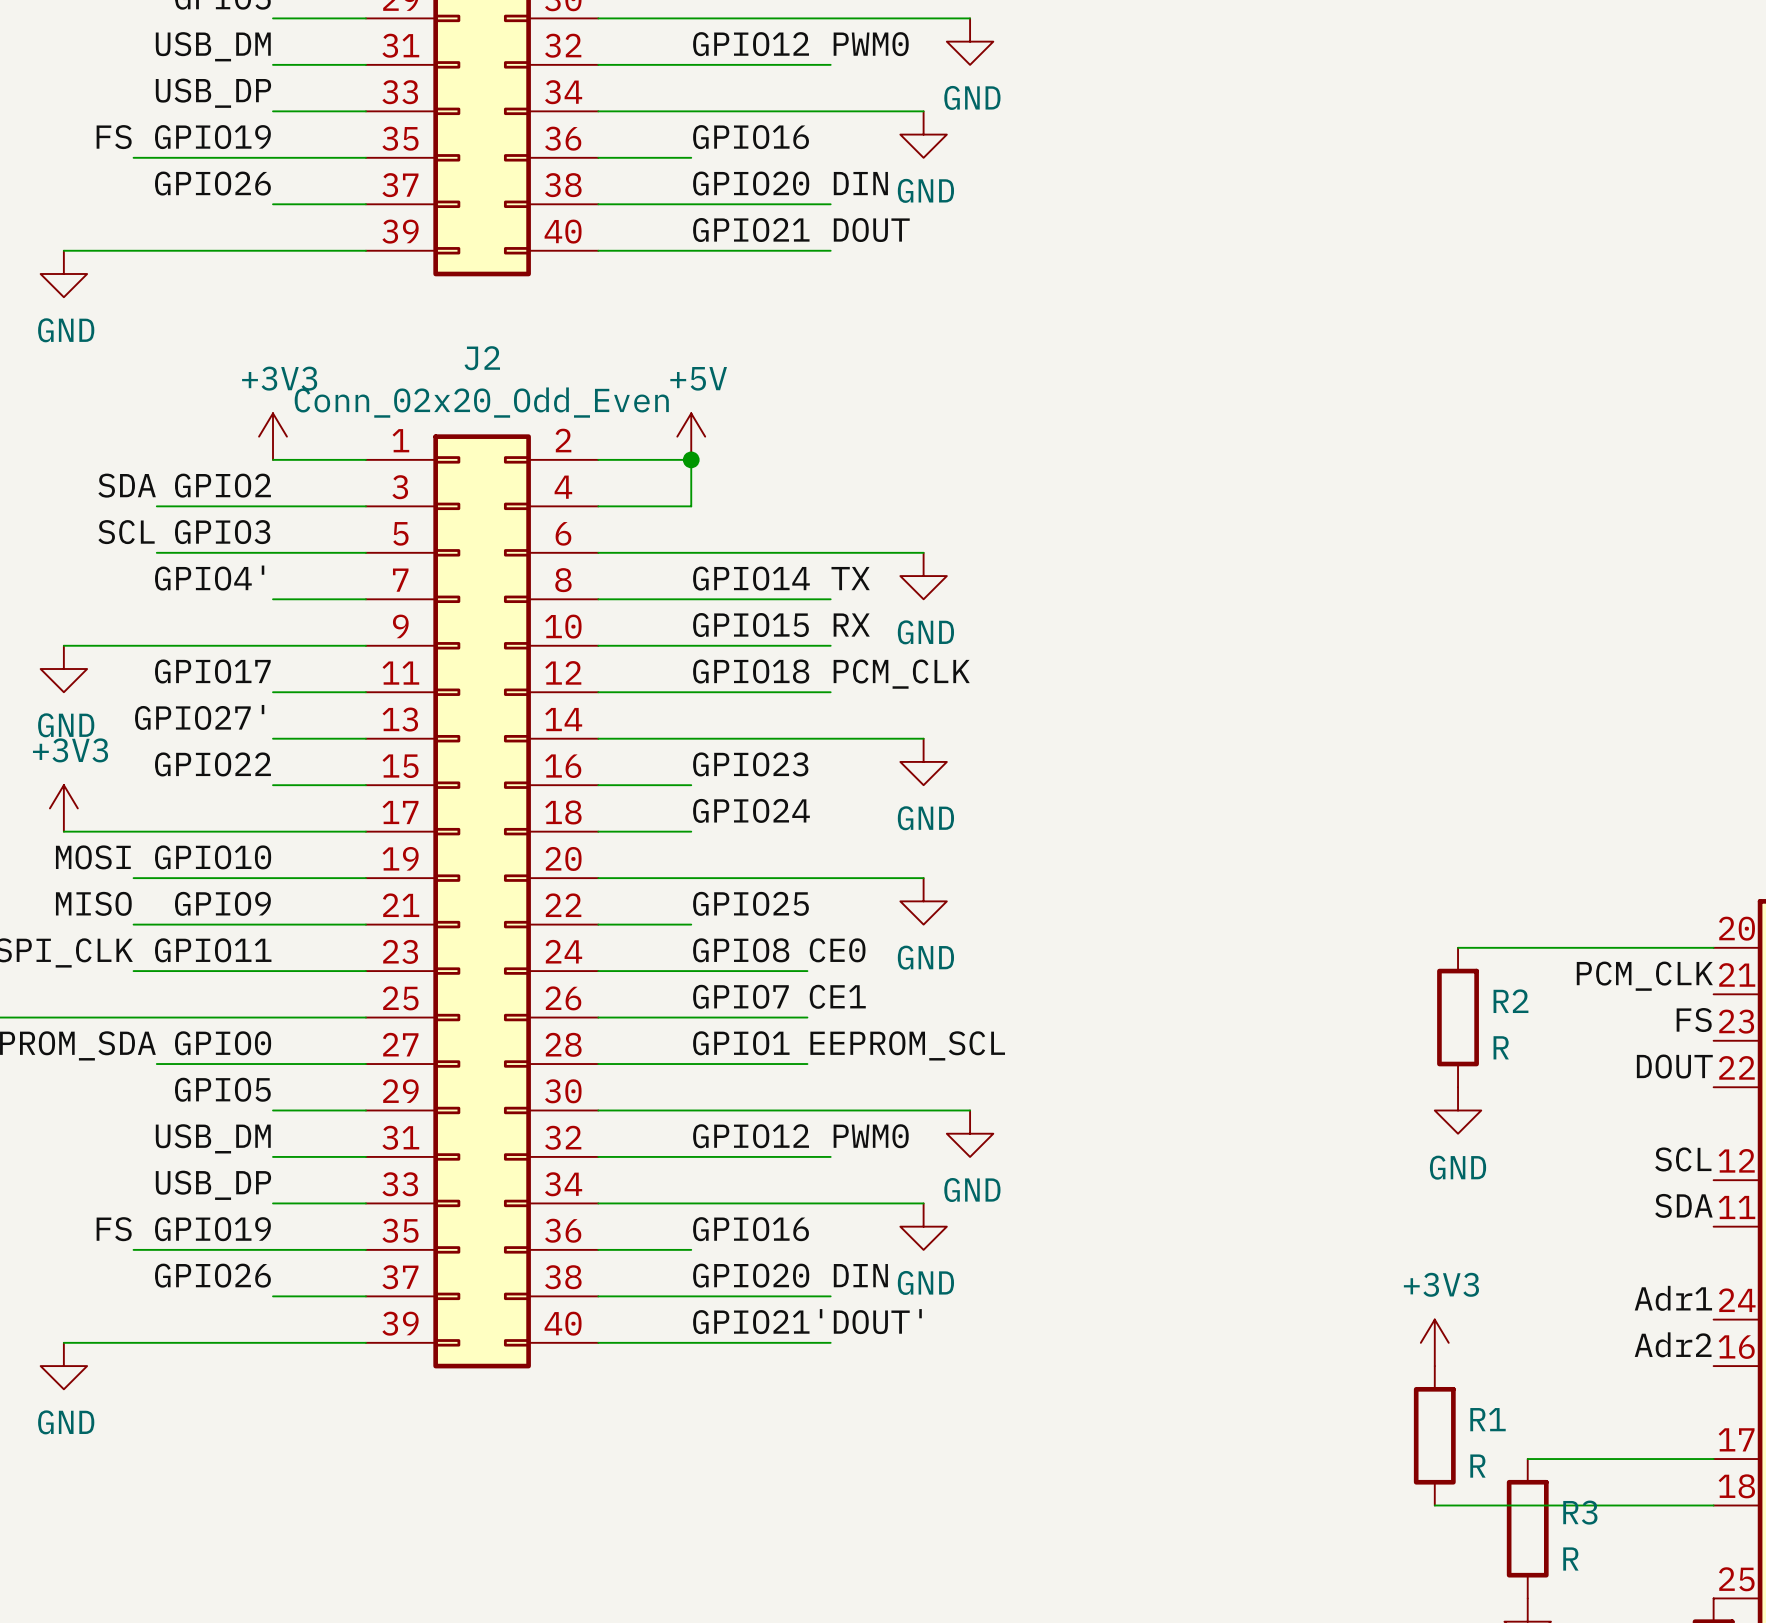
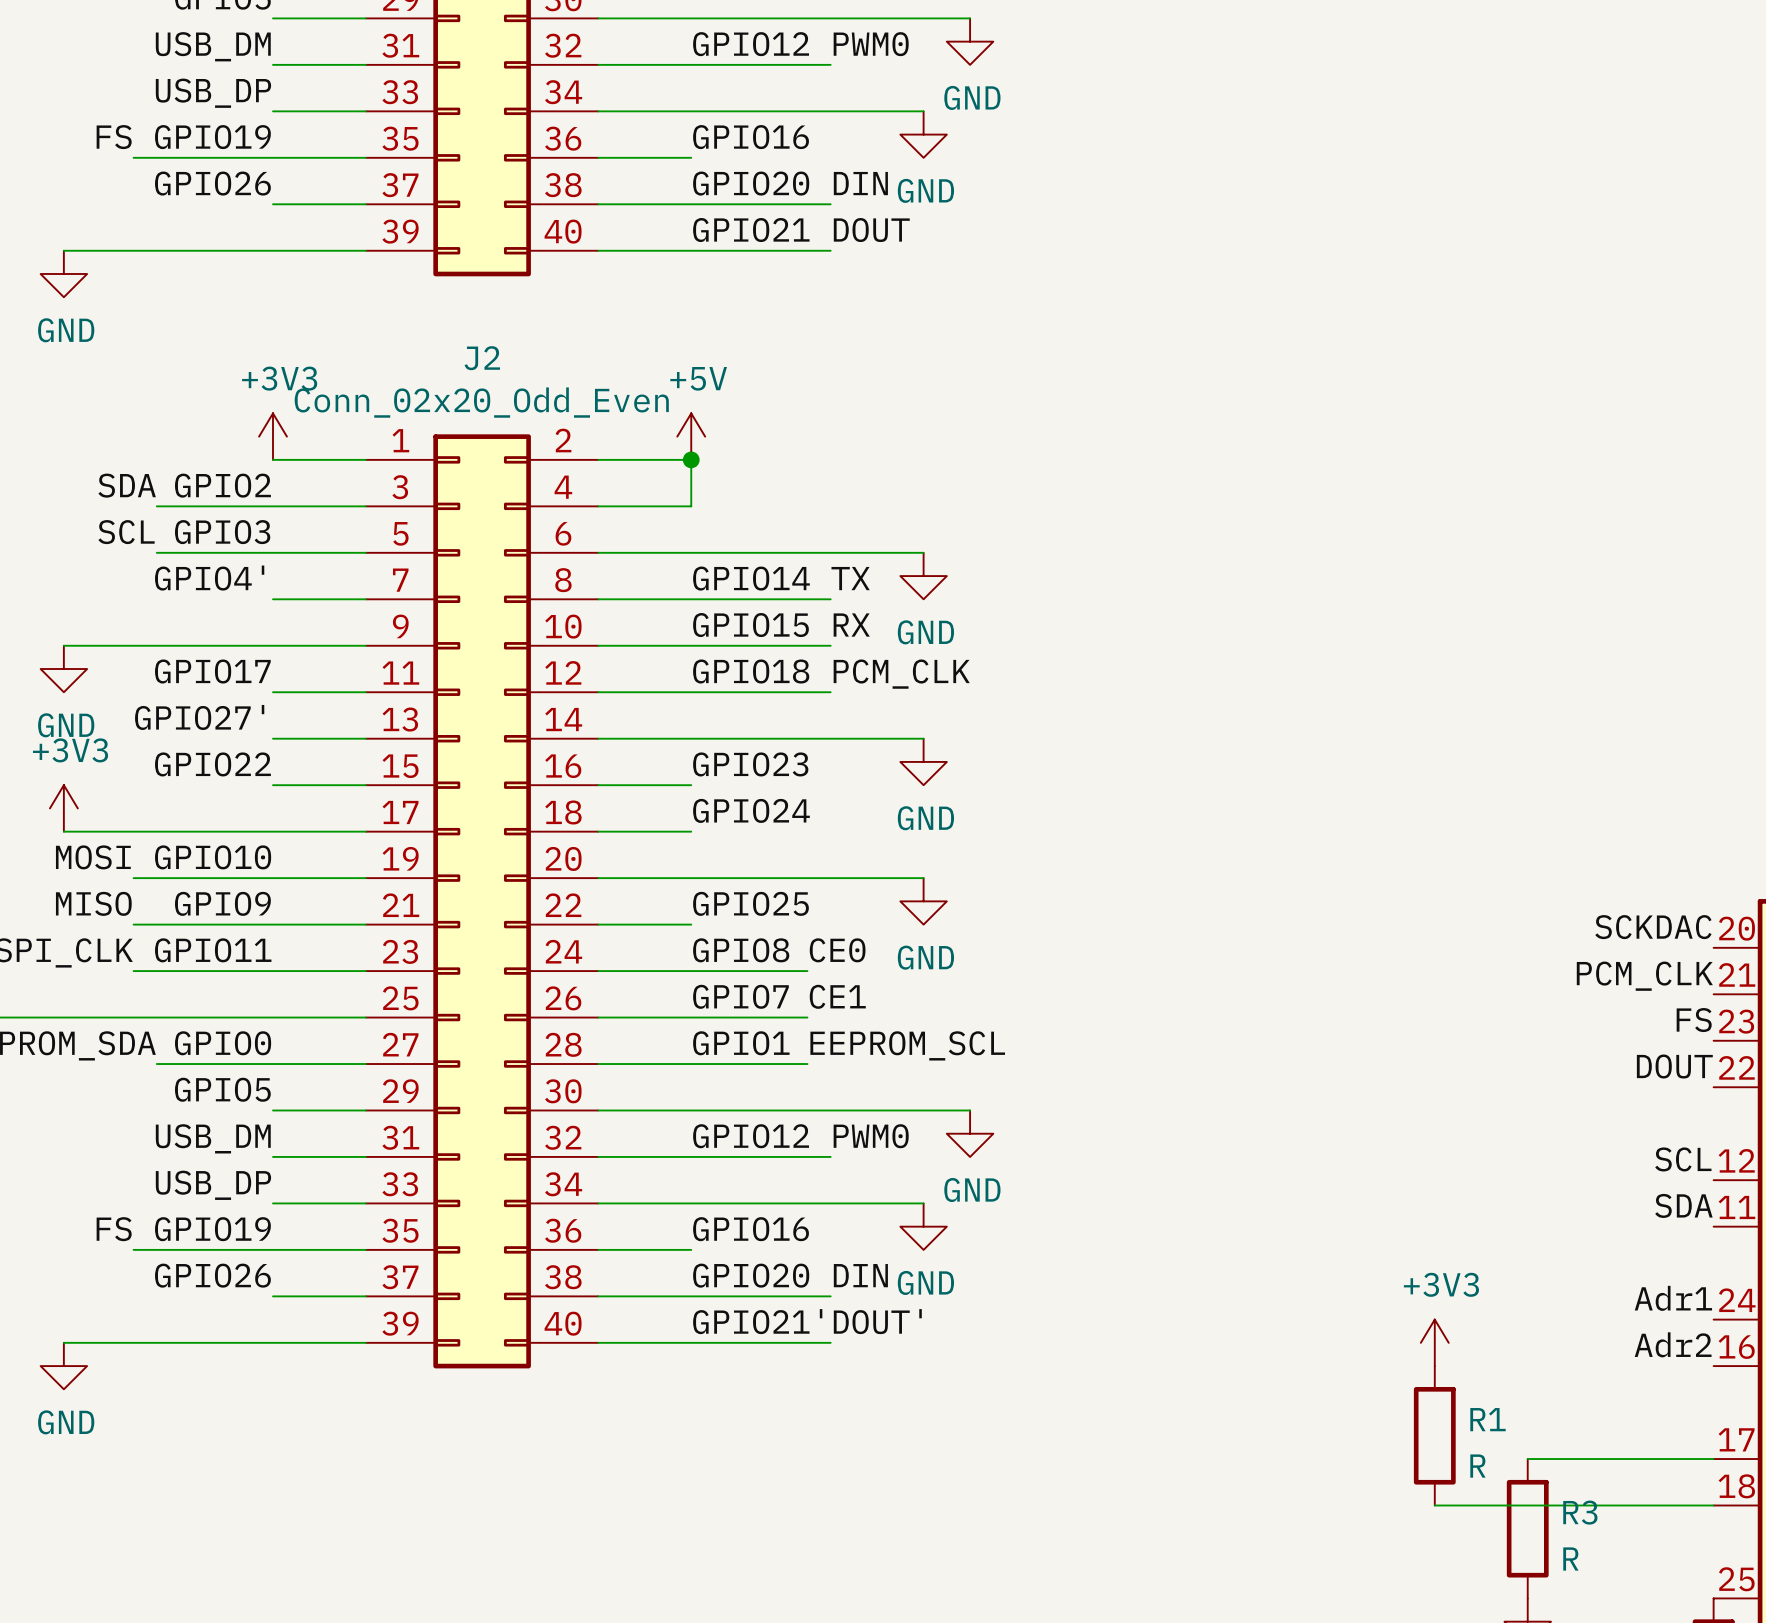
label: none -> SCKDAC (1653, 927)
wire: (1458, 947) (1713, 947) -> none
R2: R (1458, 1017) -> none
power symbol: GND (1458, 1110) -> none

